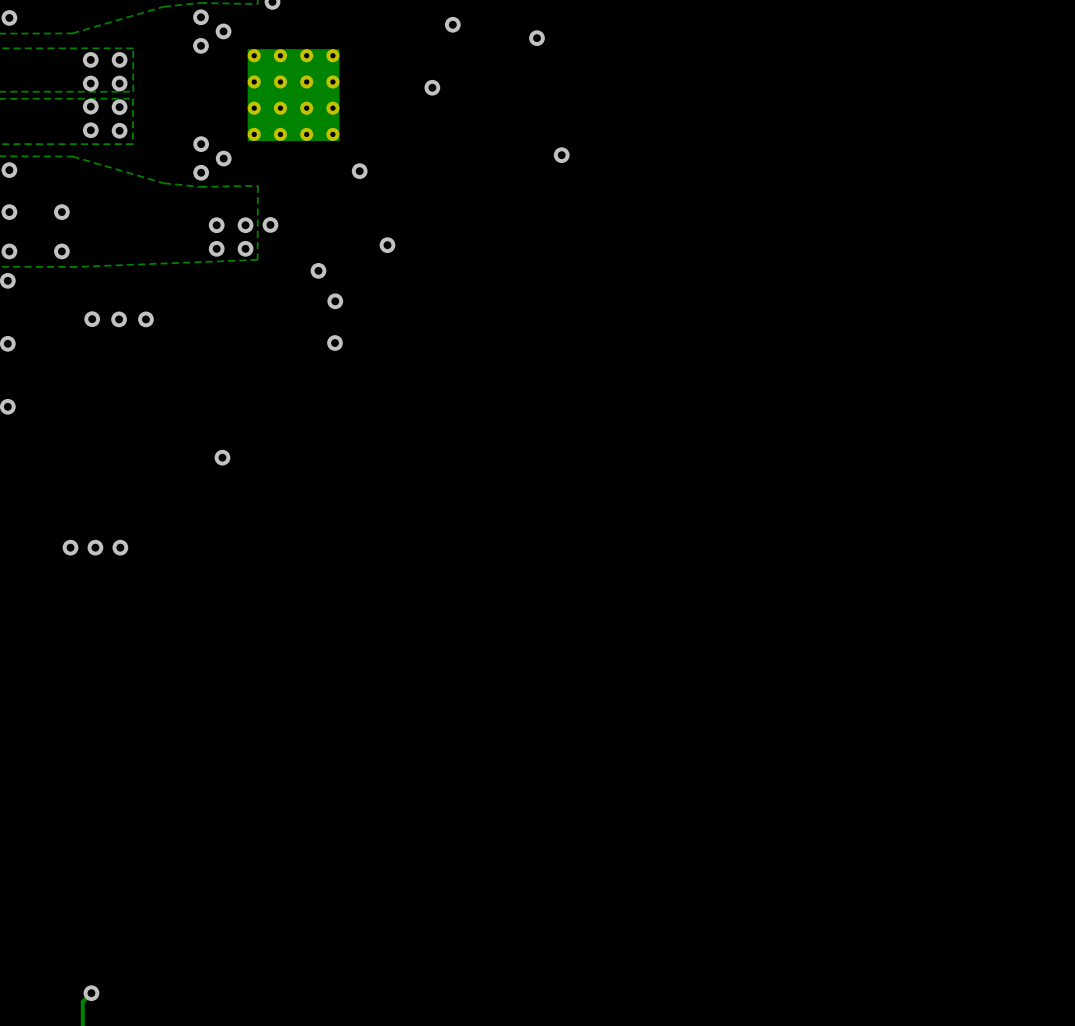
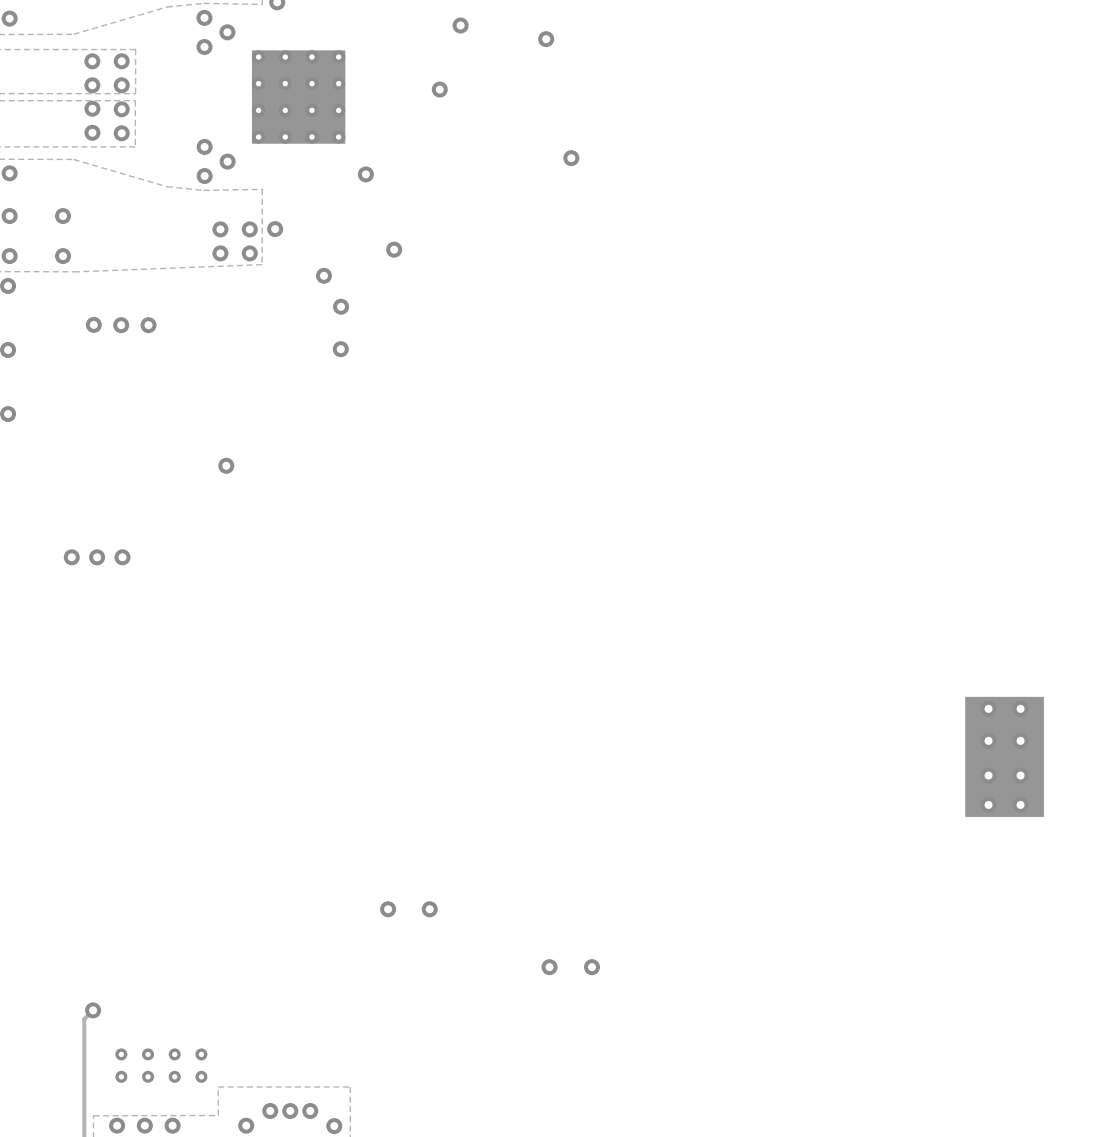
part: none -> (1004, 756)
via: none -> (388, 909)
via: none -> (429, 909)
via: none -> (549, 967)
via: none -> (591, 967)

